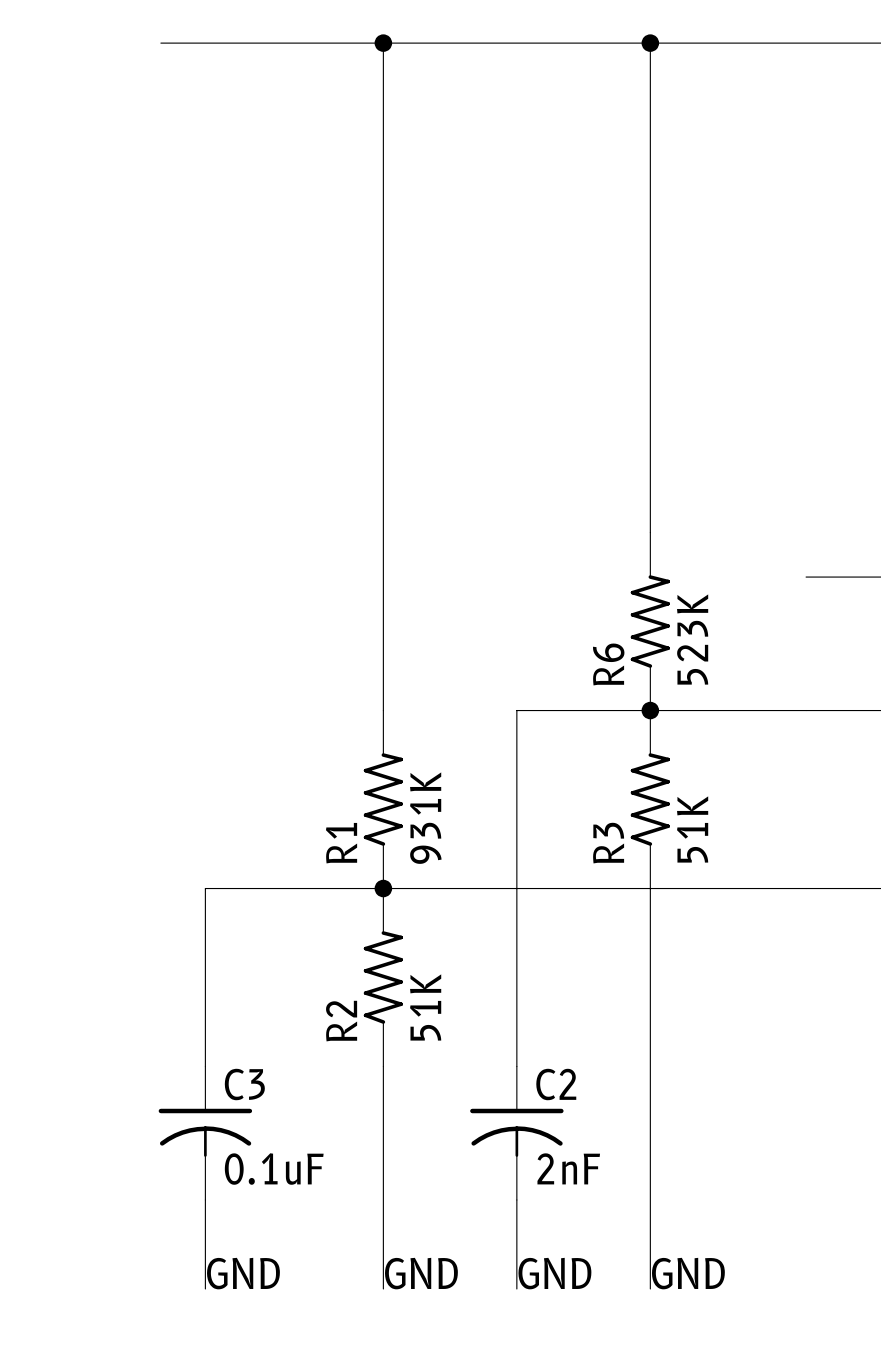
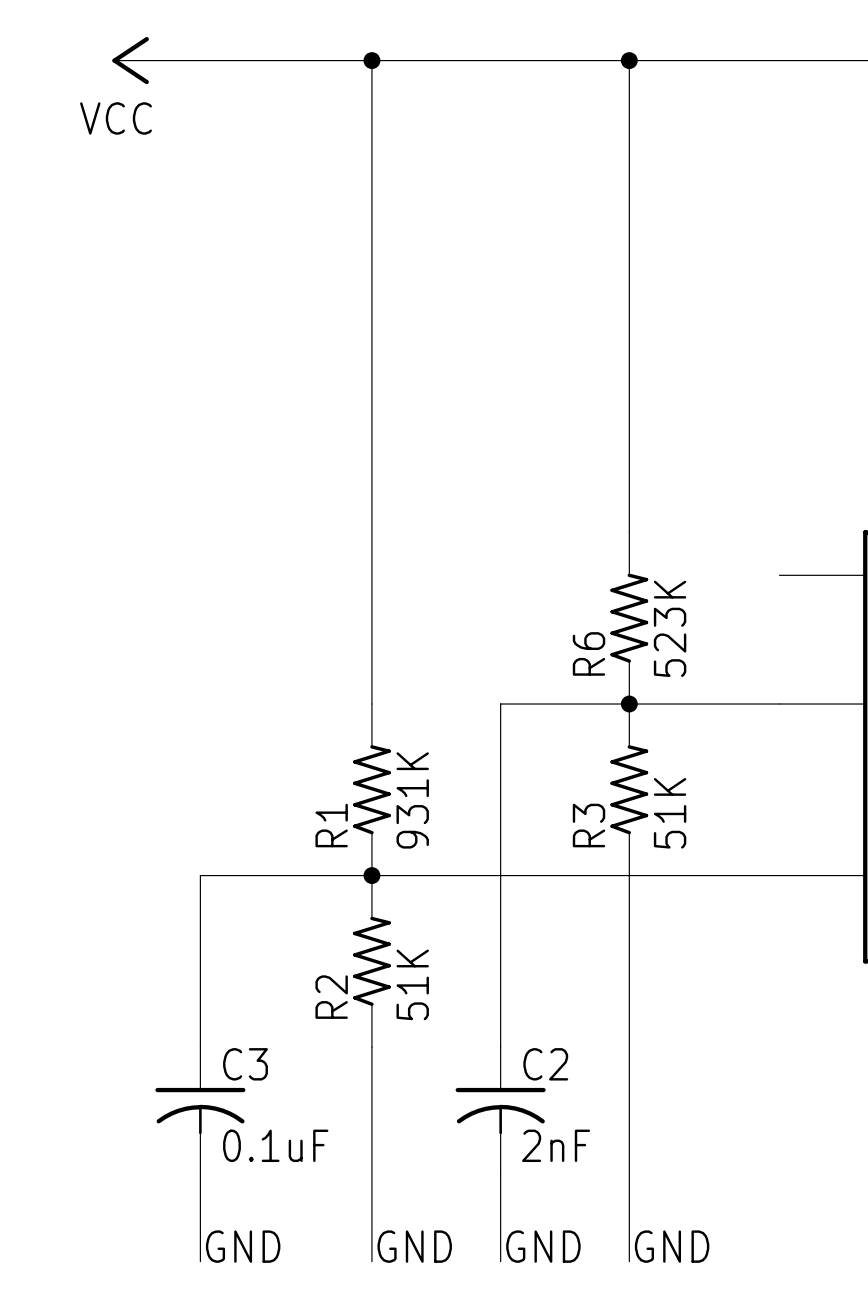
power symbol: none -> VCC (134, 60)

